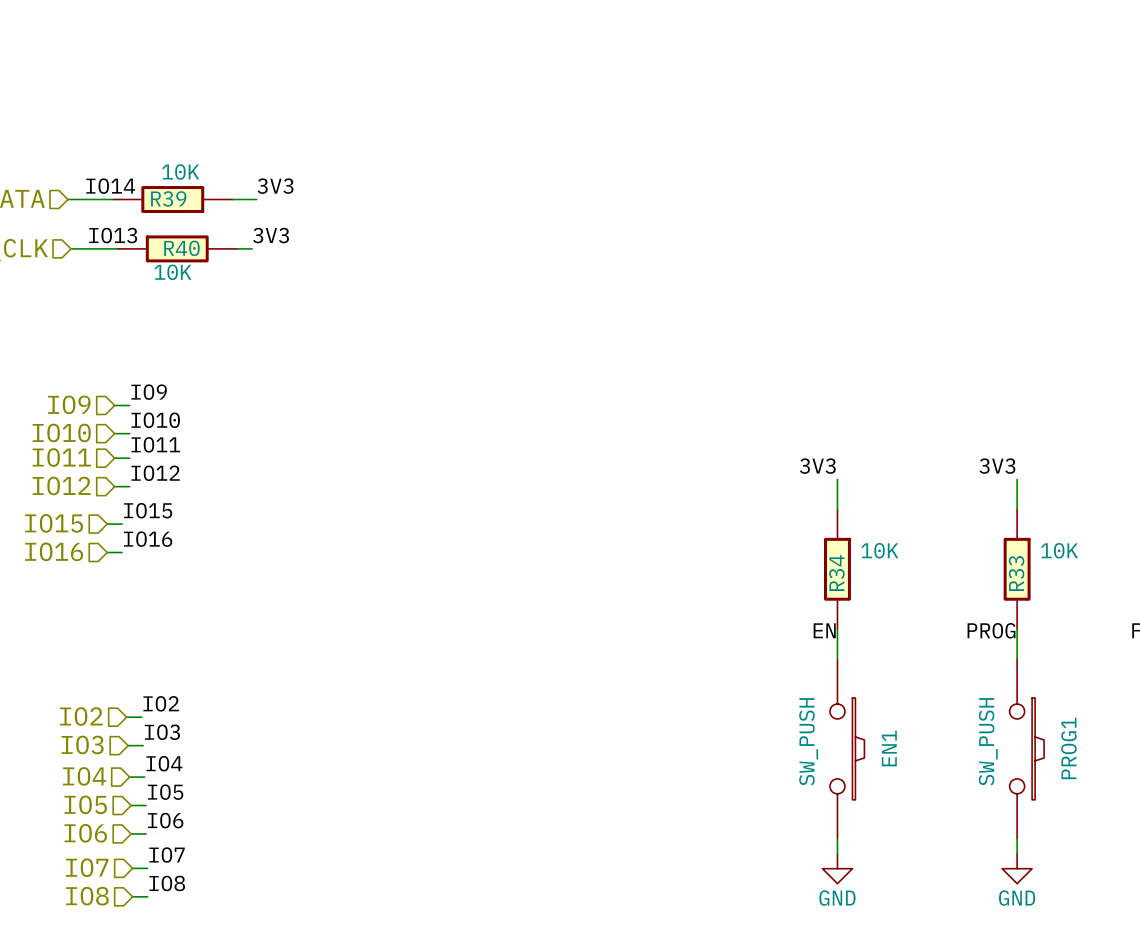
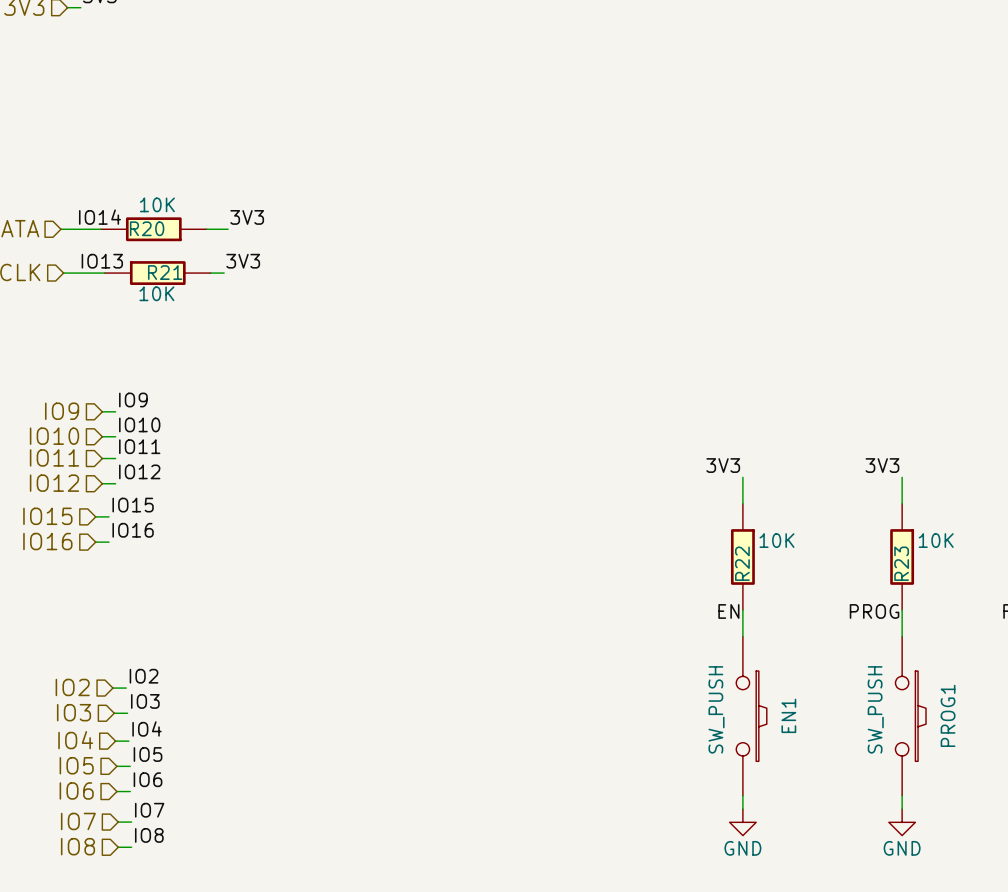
R39 name: R39 (168, 198) -> R20 (147, 228)
R40 name: R40 (181, 248) -> R21 (165, 272)
R34 name: R34 (836, 573) -> R22 (742, 563)
R33 name: R33 (1016, 573) -> R23 (901, 563)

